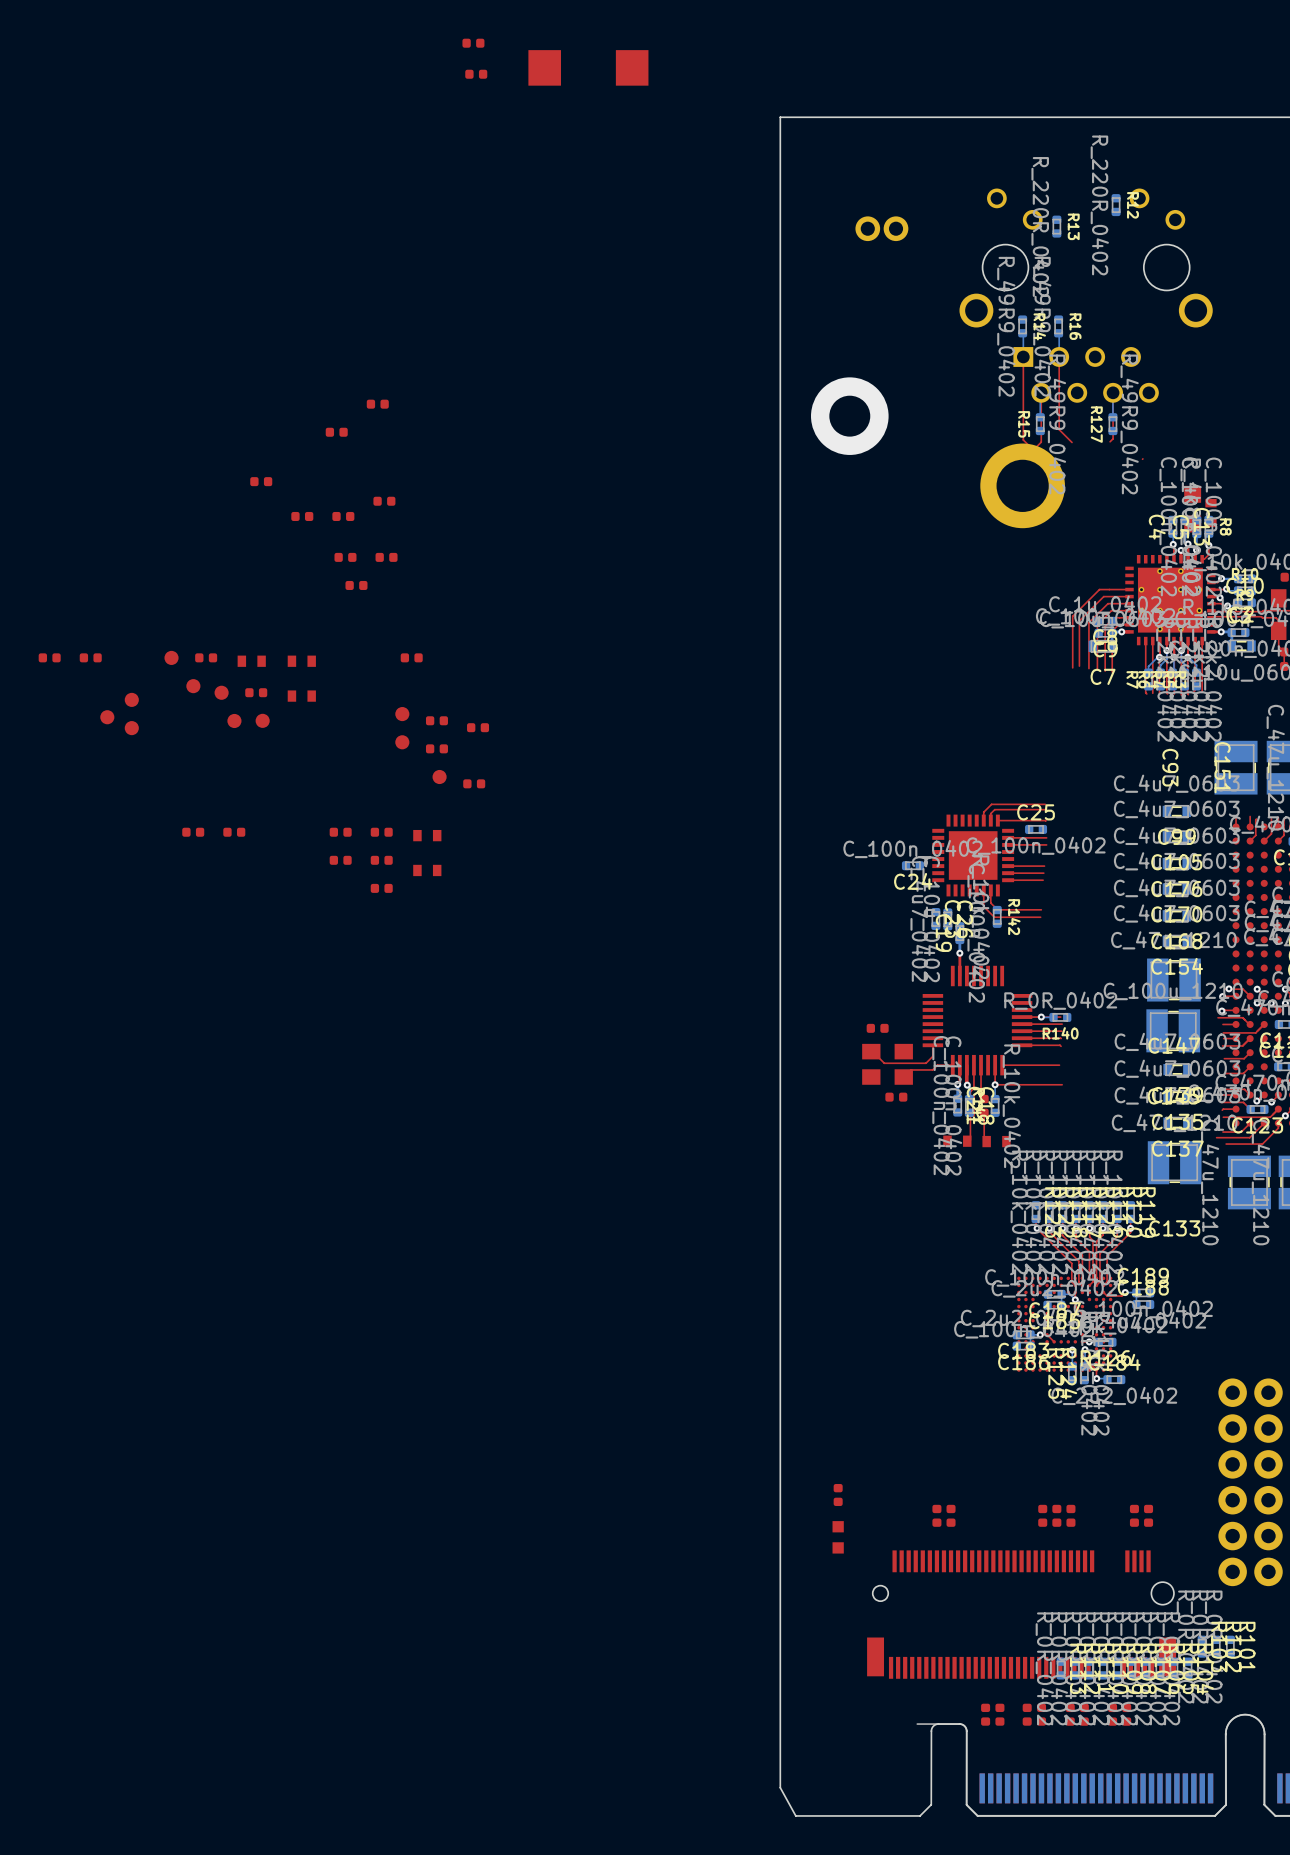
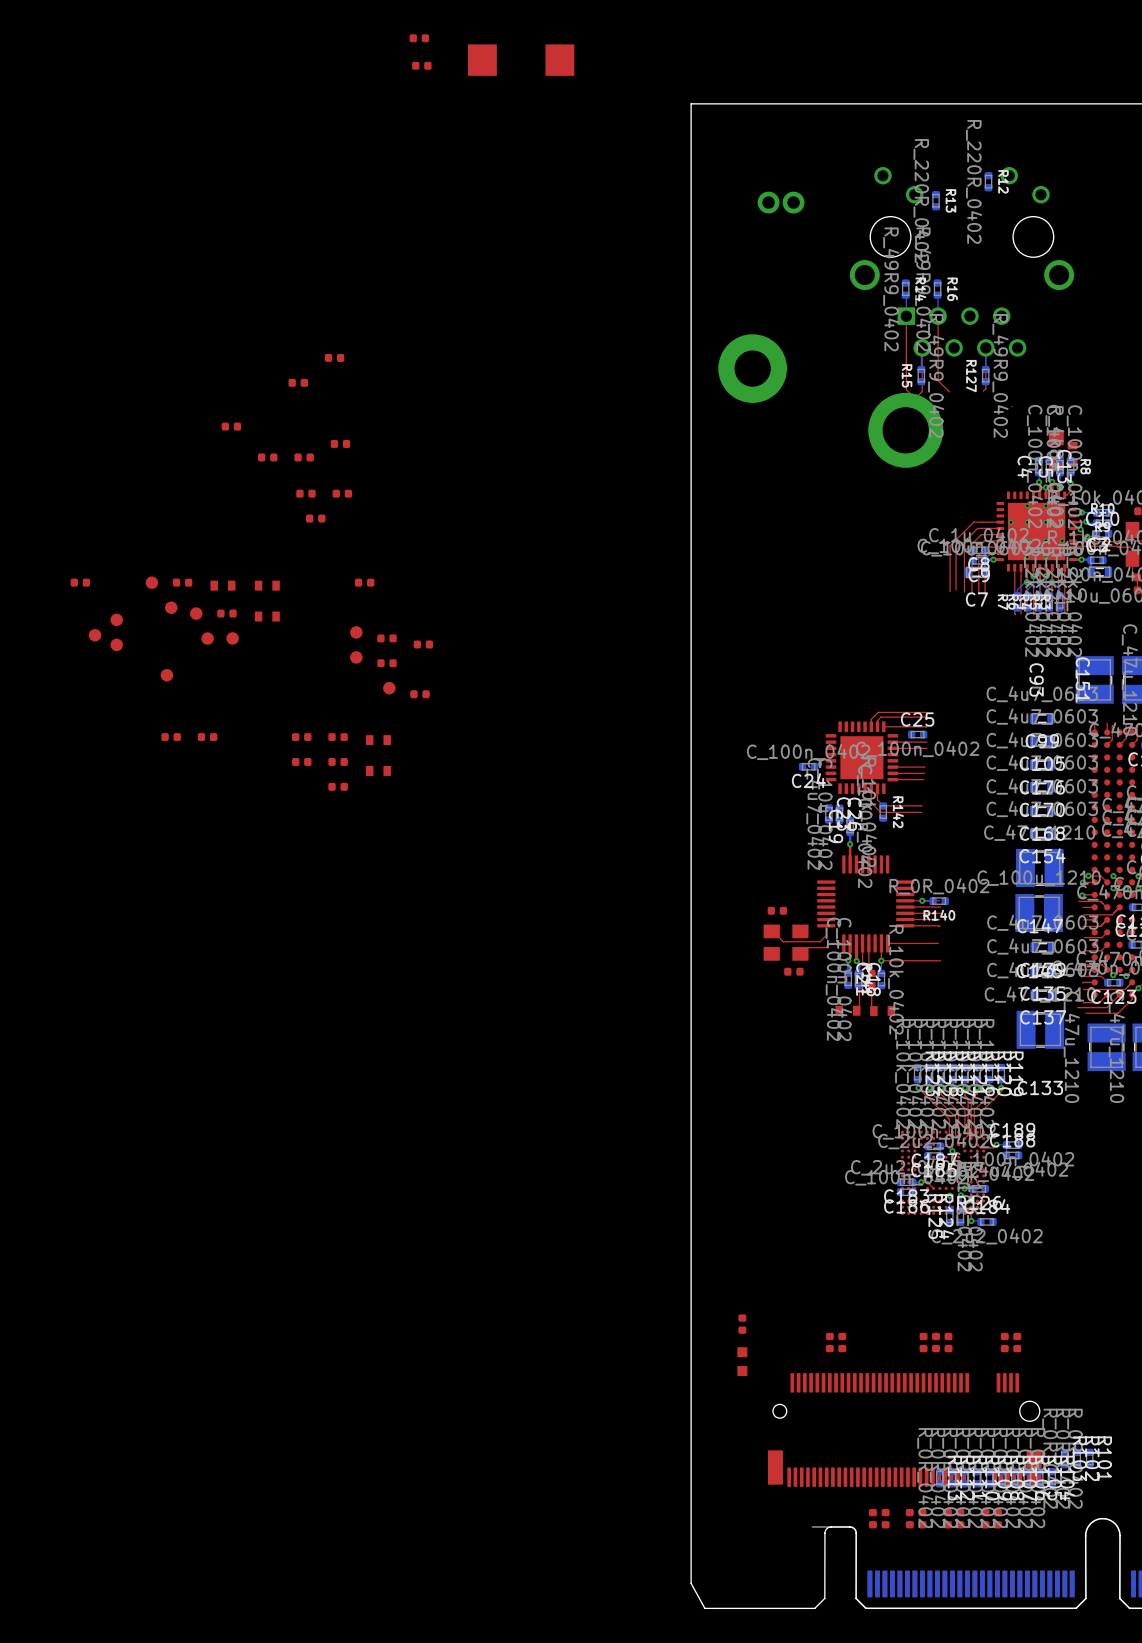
part: (49, 657) -> none
part: none -> (166, 675)
part: (1250, 1482) -> none

